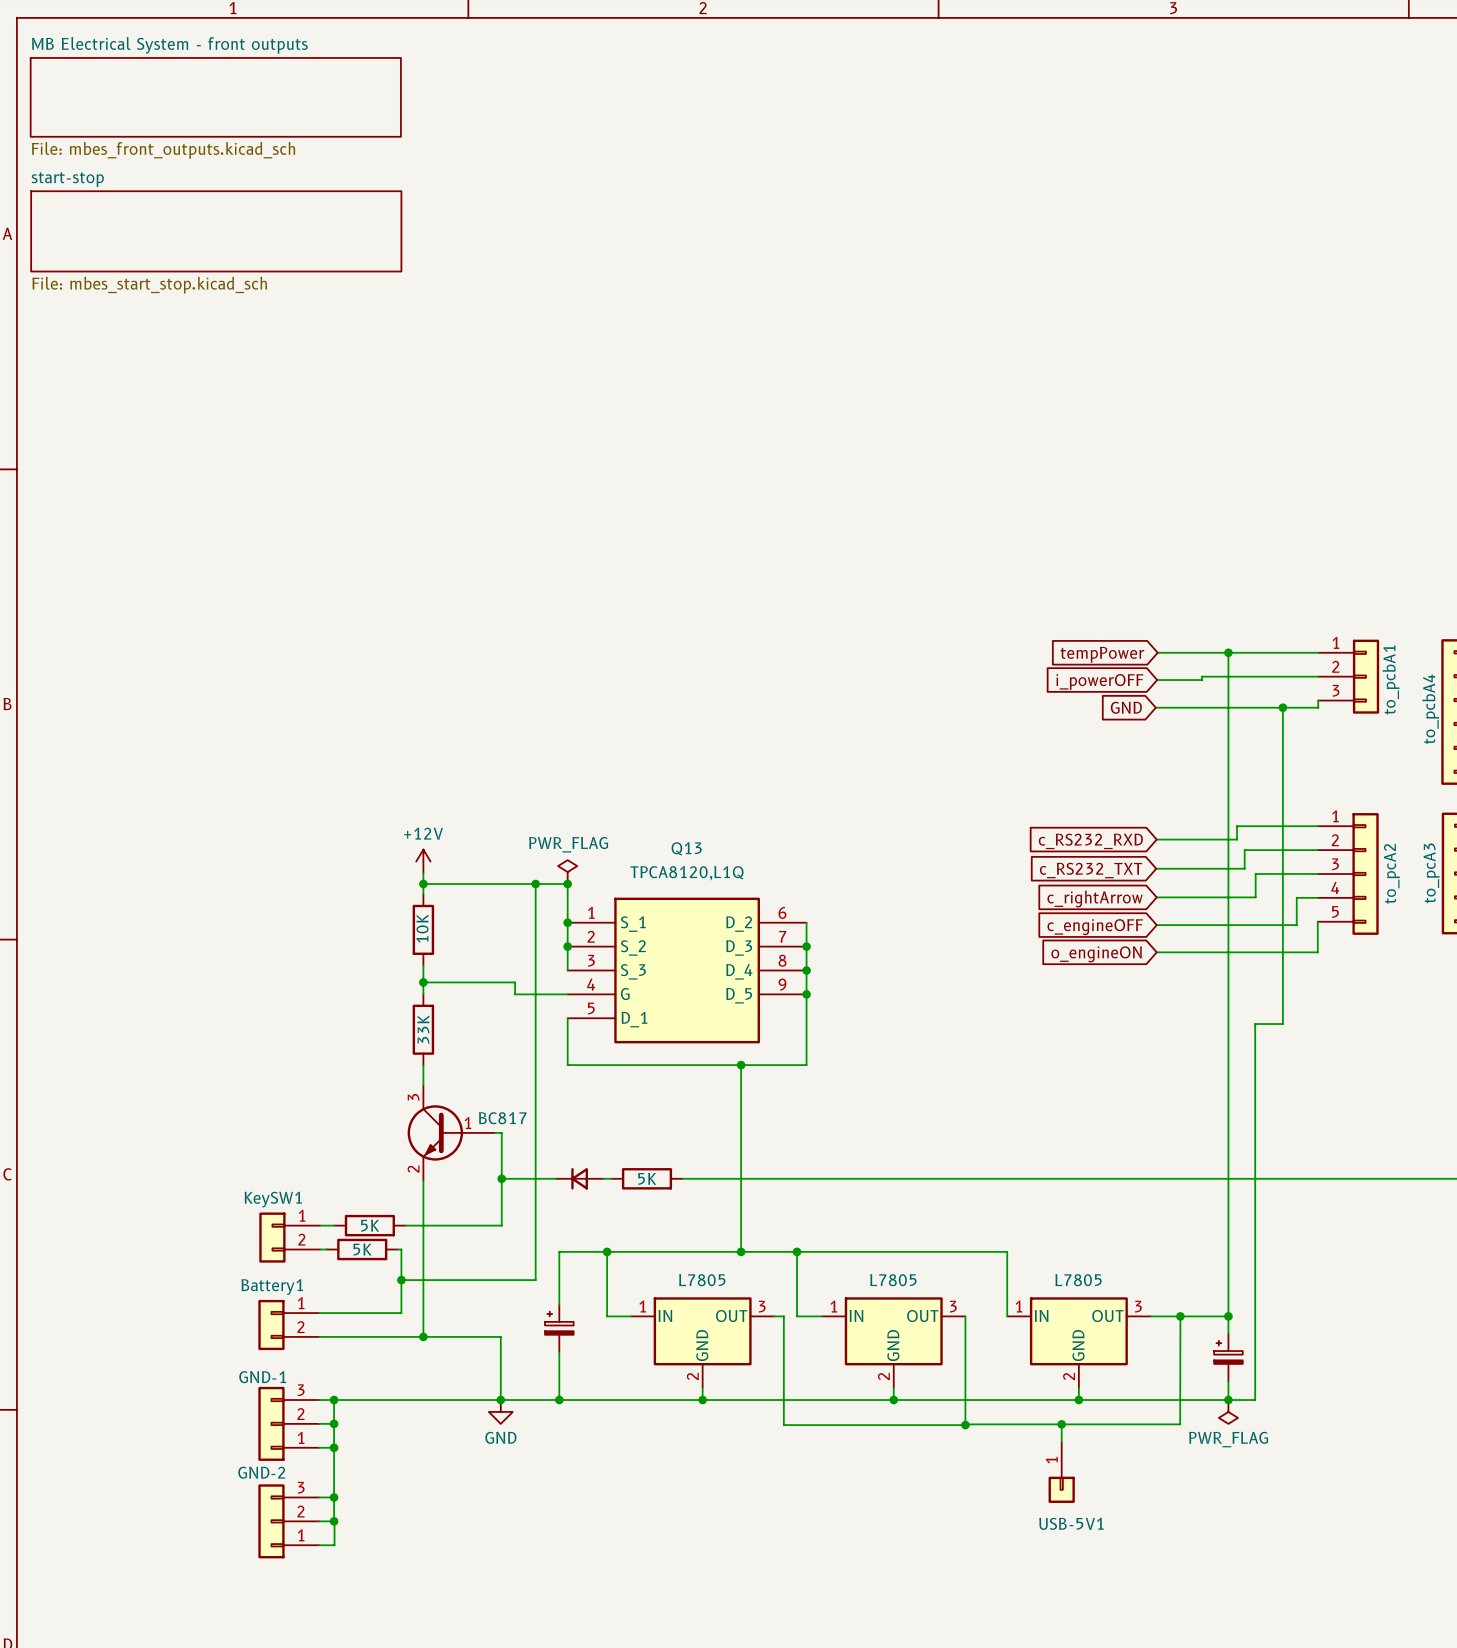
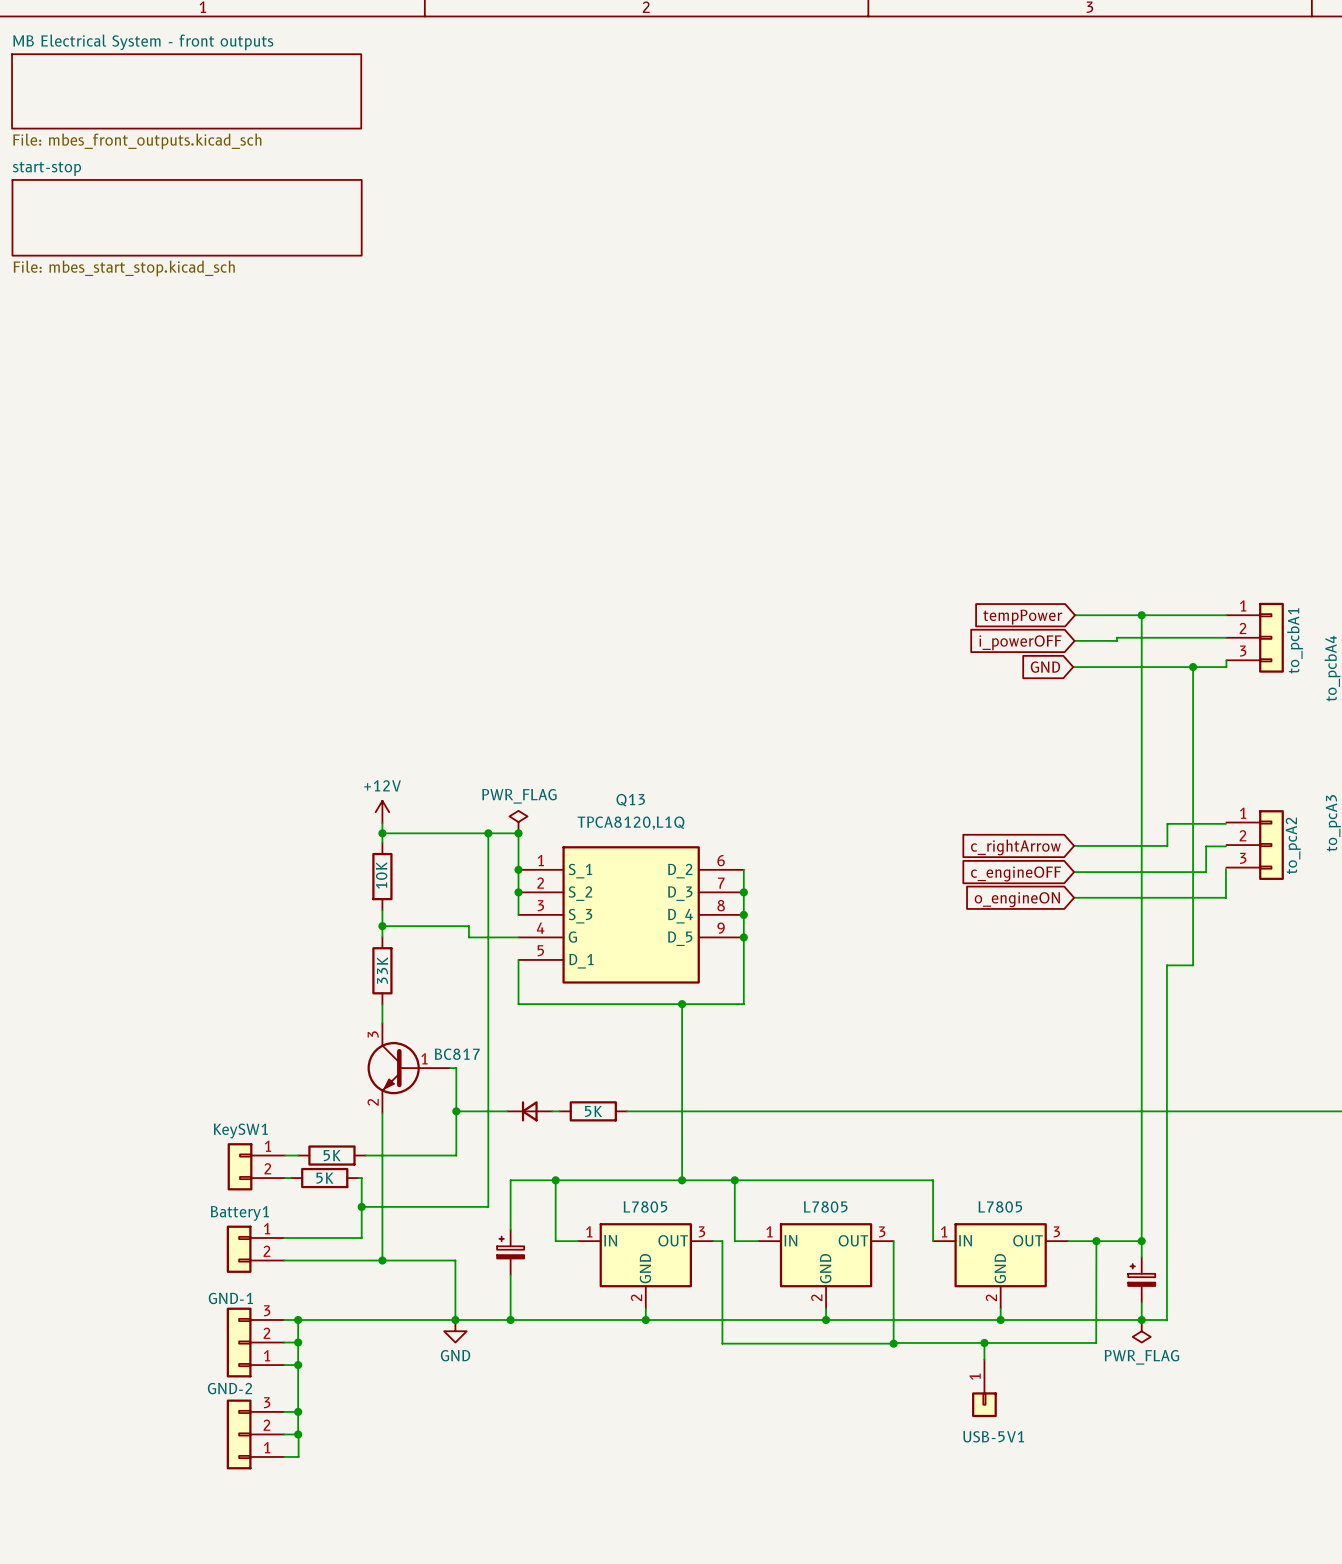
to_pcA2 symbol: [1317, 813, 1379, 935] -> [1226, 810, 1284, 880]
wire: (1317, 826) (1237, 826) (1237, 839) (1156, 839) -> none
global label: c_RS232_RXD (1090, 841) -> none
wire: (1317, 850) (1244, 850) (1244, 868) (1156, 868) -> none
global label: c_RS232_TXT (1091, 870) -> none

